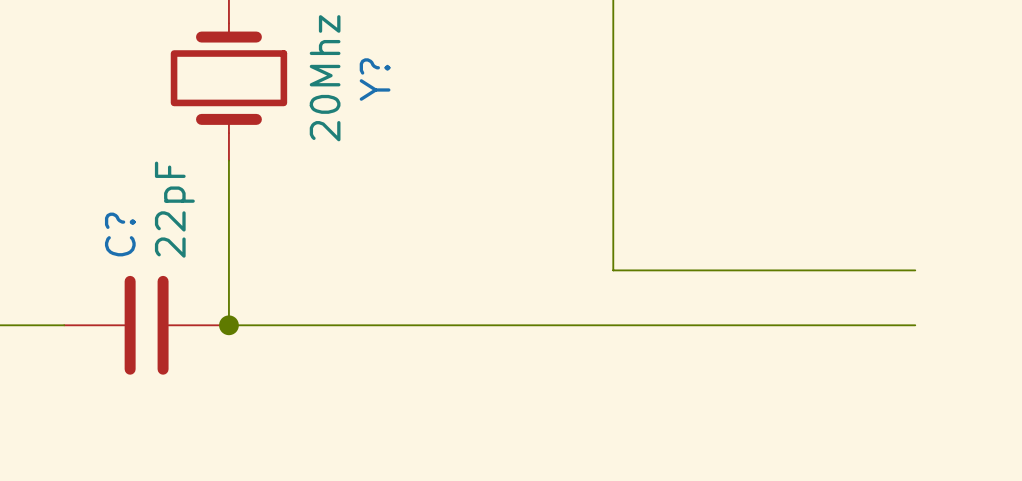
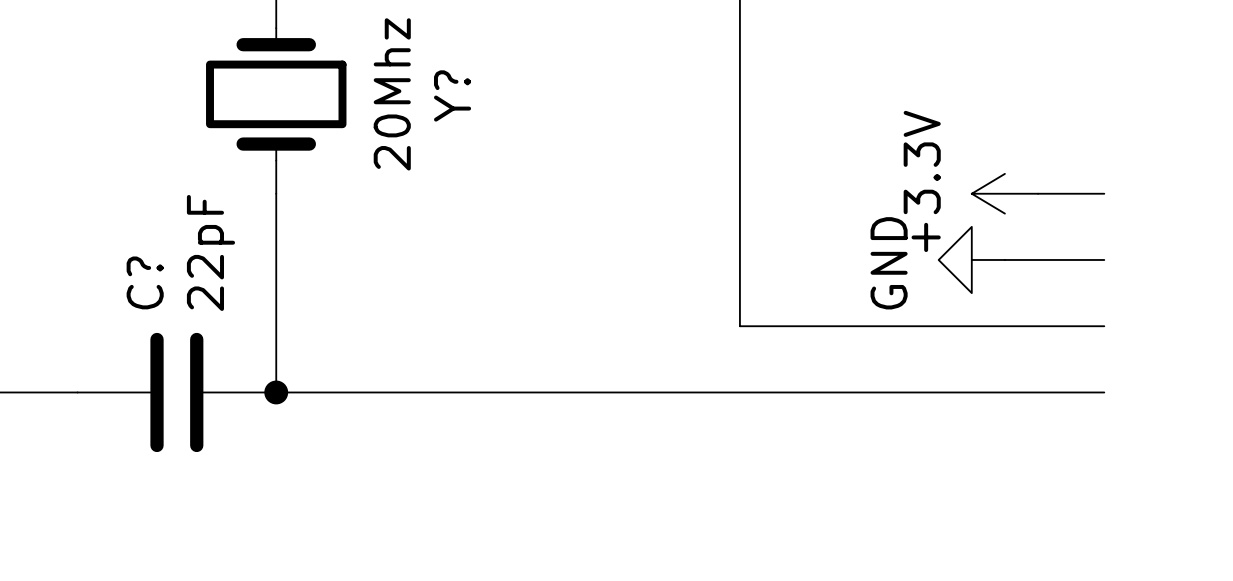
power symbol: none -> +3.3V (1004, 193)
wire: none -> (1038, 193) (1104, 193)
power symbol: none -> GND (971, 259)
wire: none -> (1004, 259) (1104, 259)

